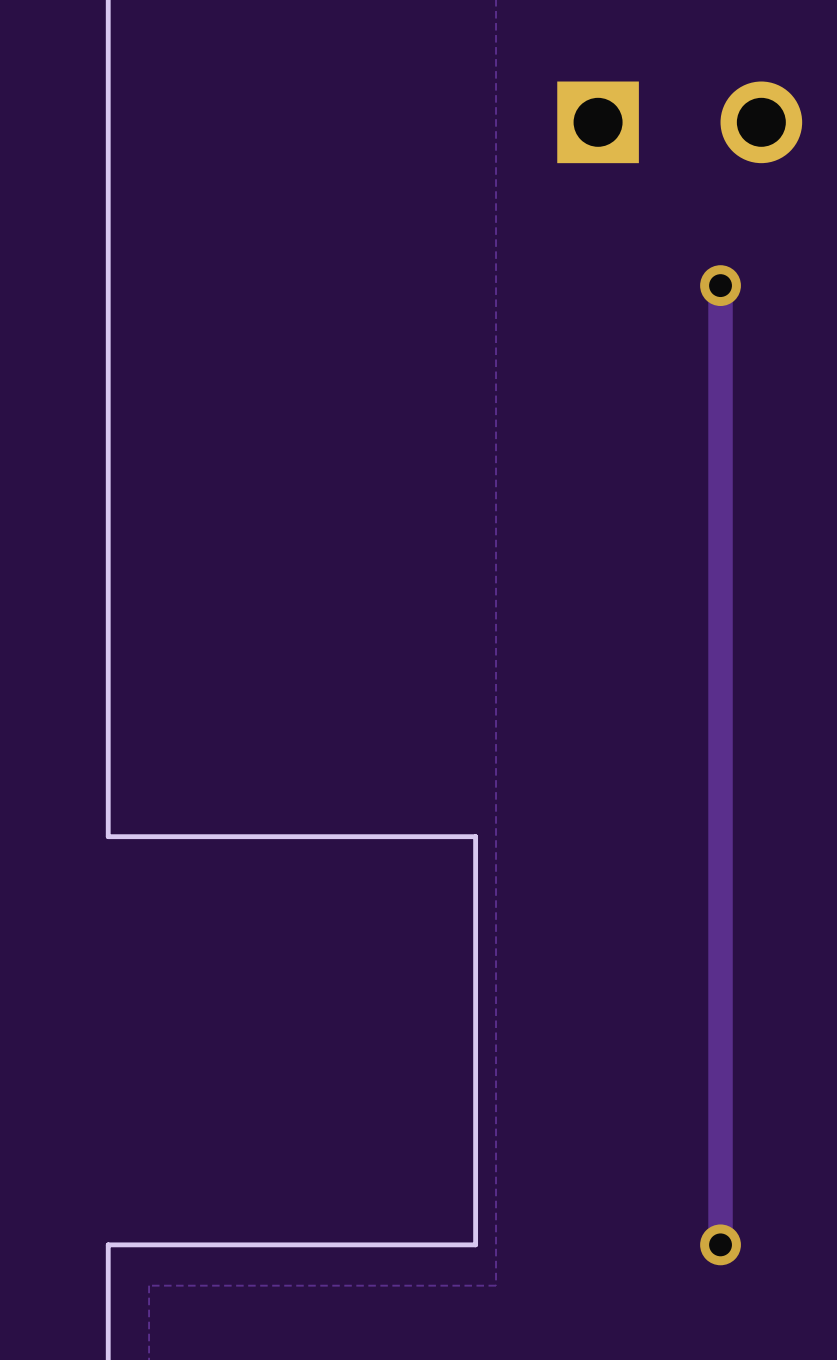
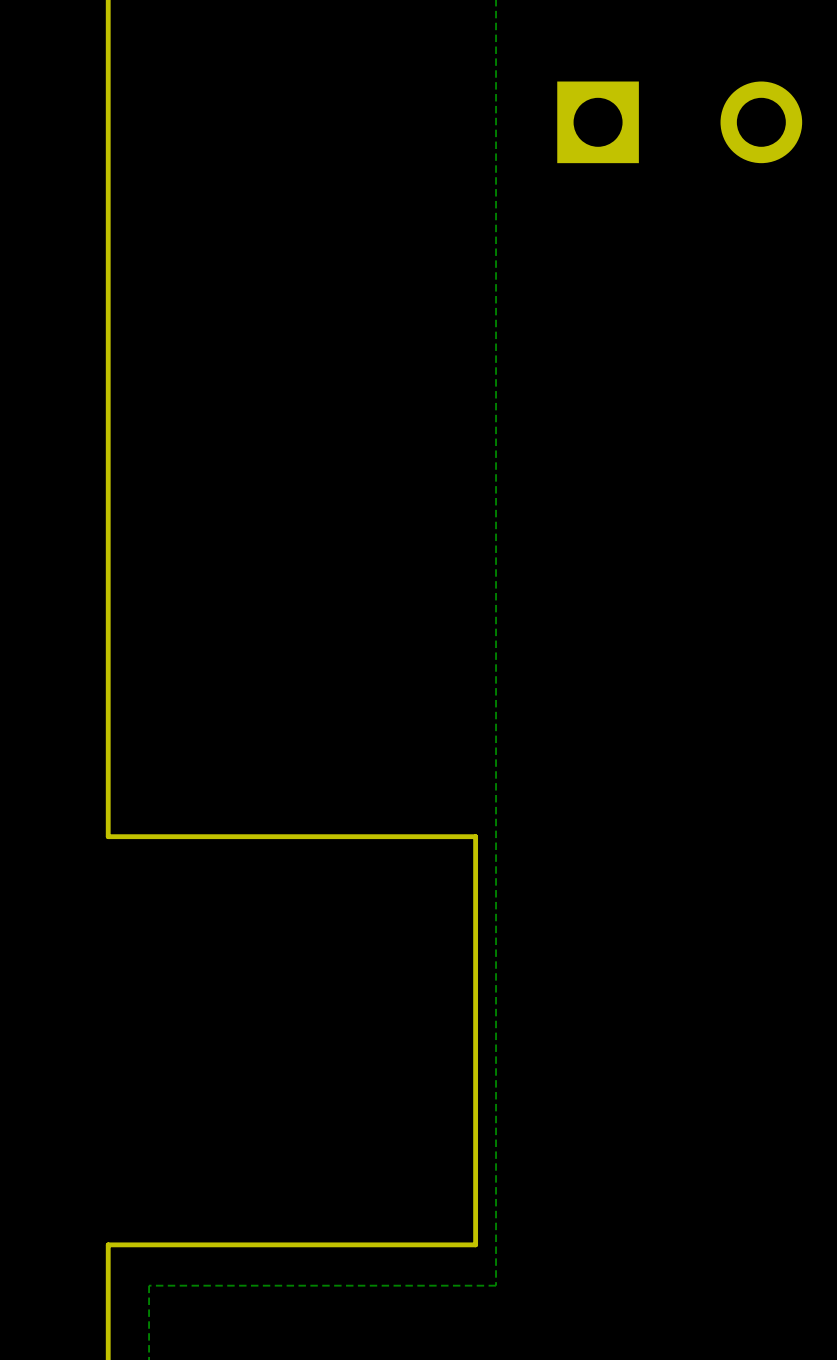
track: (720, 285) (720, 1244) -> none
via: (720, 285) -> none
via: (720, 1244) -> none

